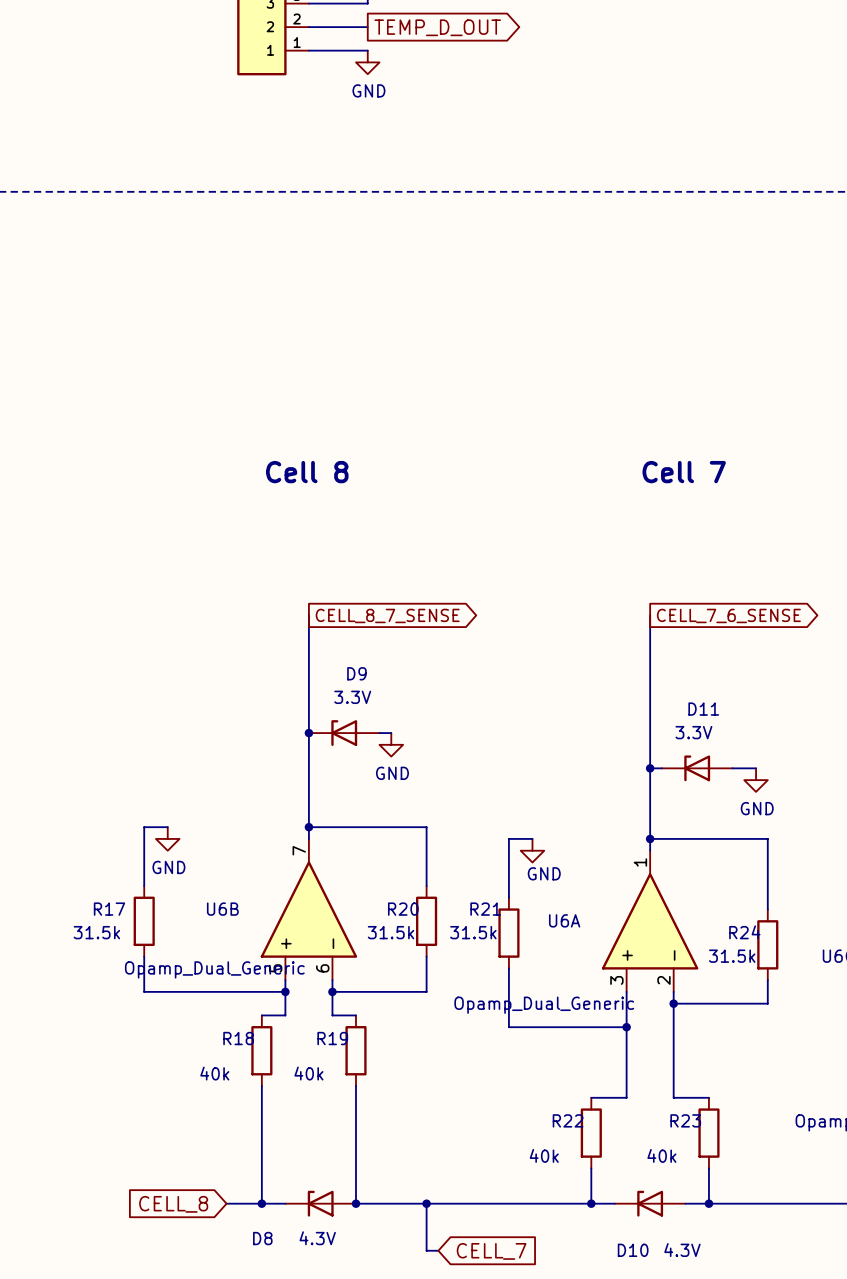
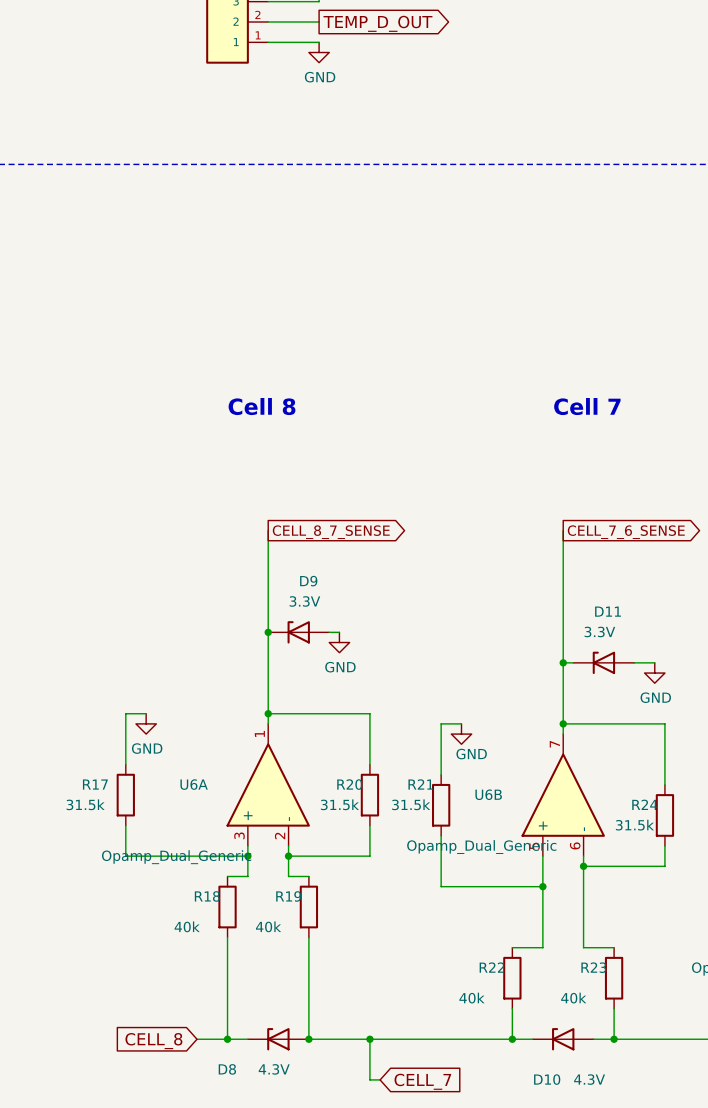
U6B position: (308, 909) -> (563, 795)
U6A position: (650, 921) -> (268, 784)

